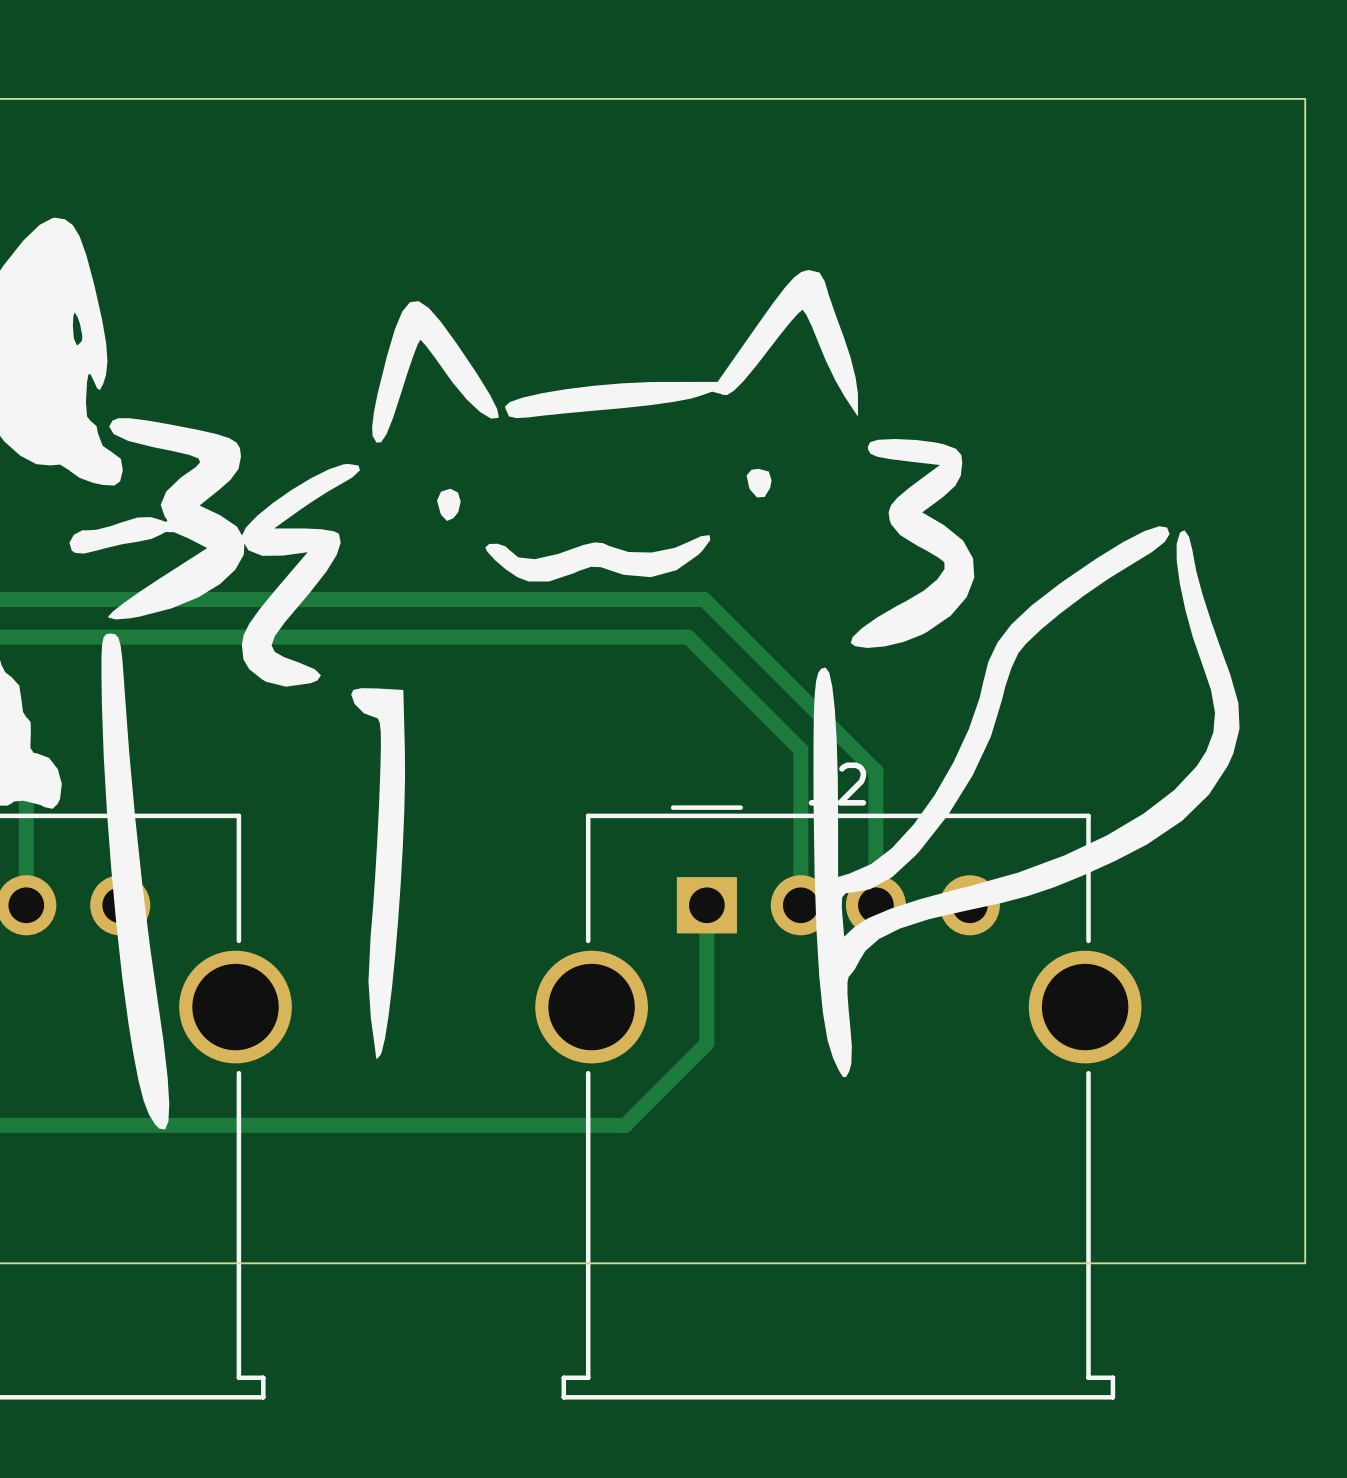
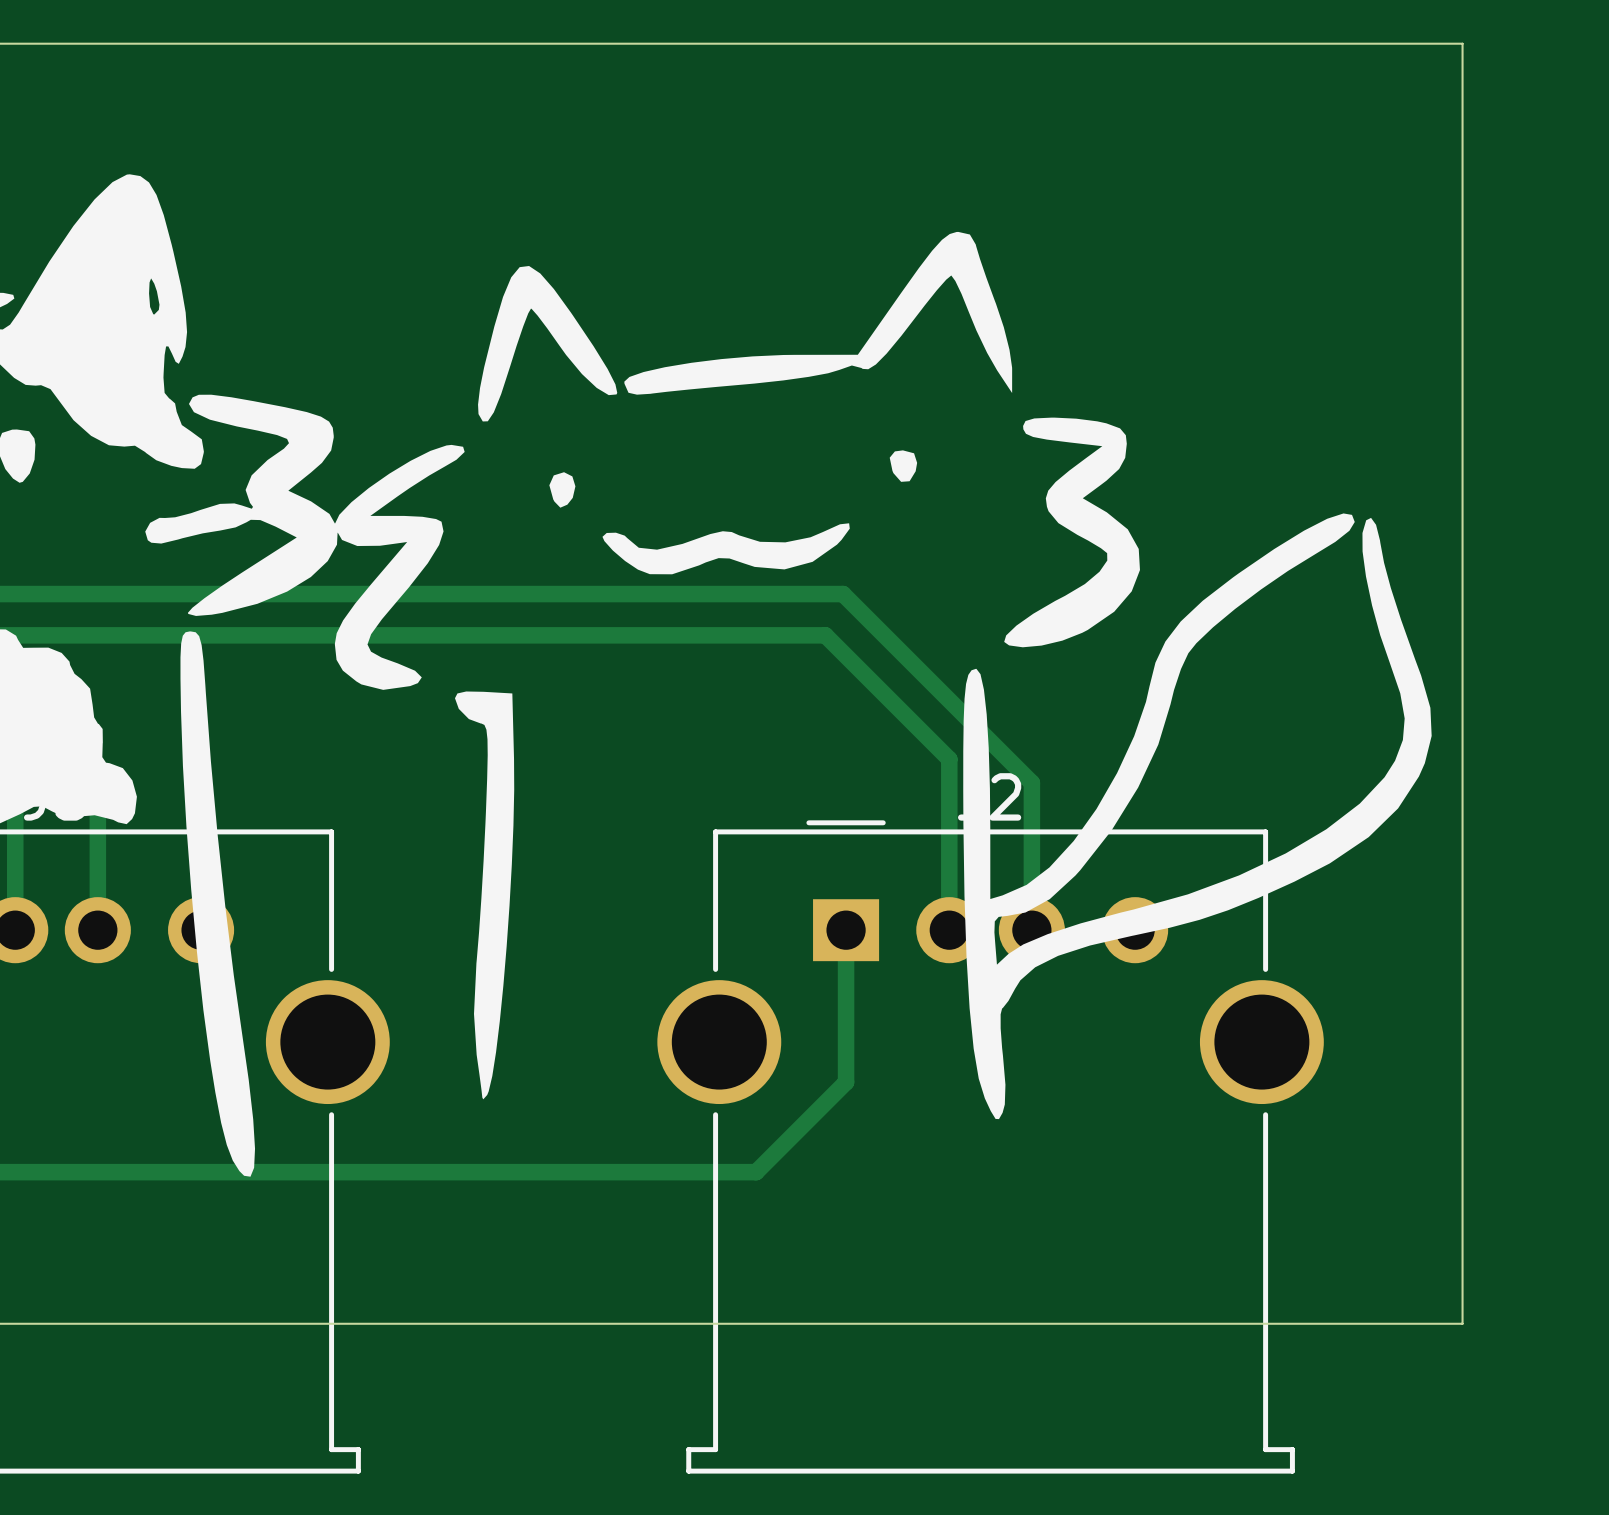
board edge: (1267, 98) (1305, 98) (1305, 1263) (1267, 1263) -> (1462, 43) (1462, 1323)

